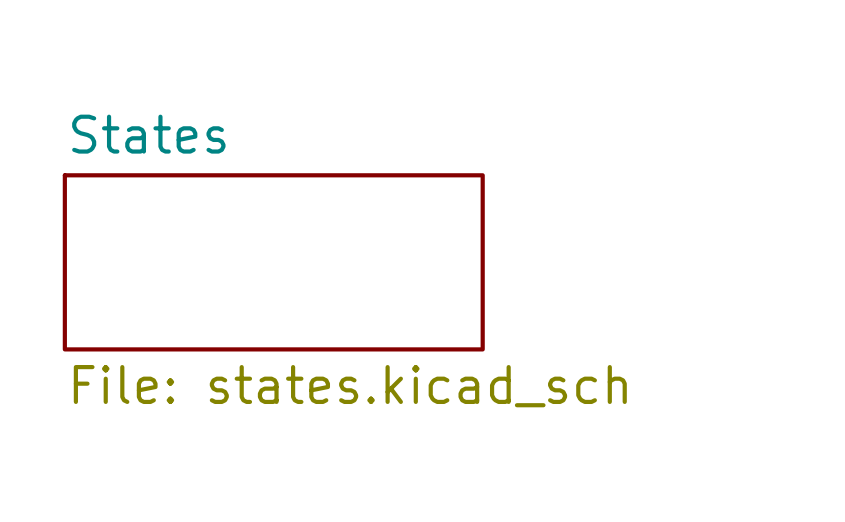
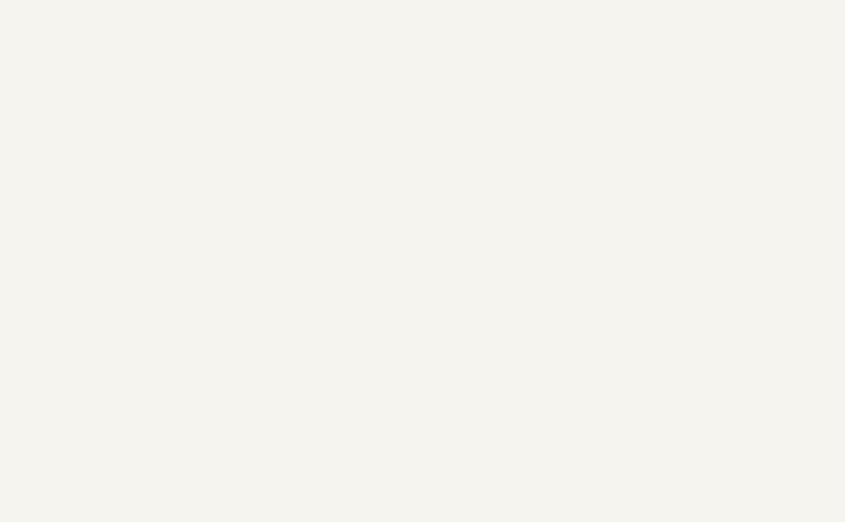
sheet States: File: states.kicad_sch (273, 262) -> none

